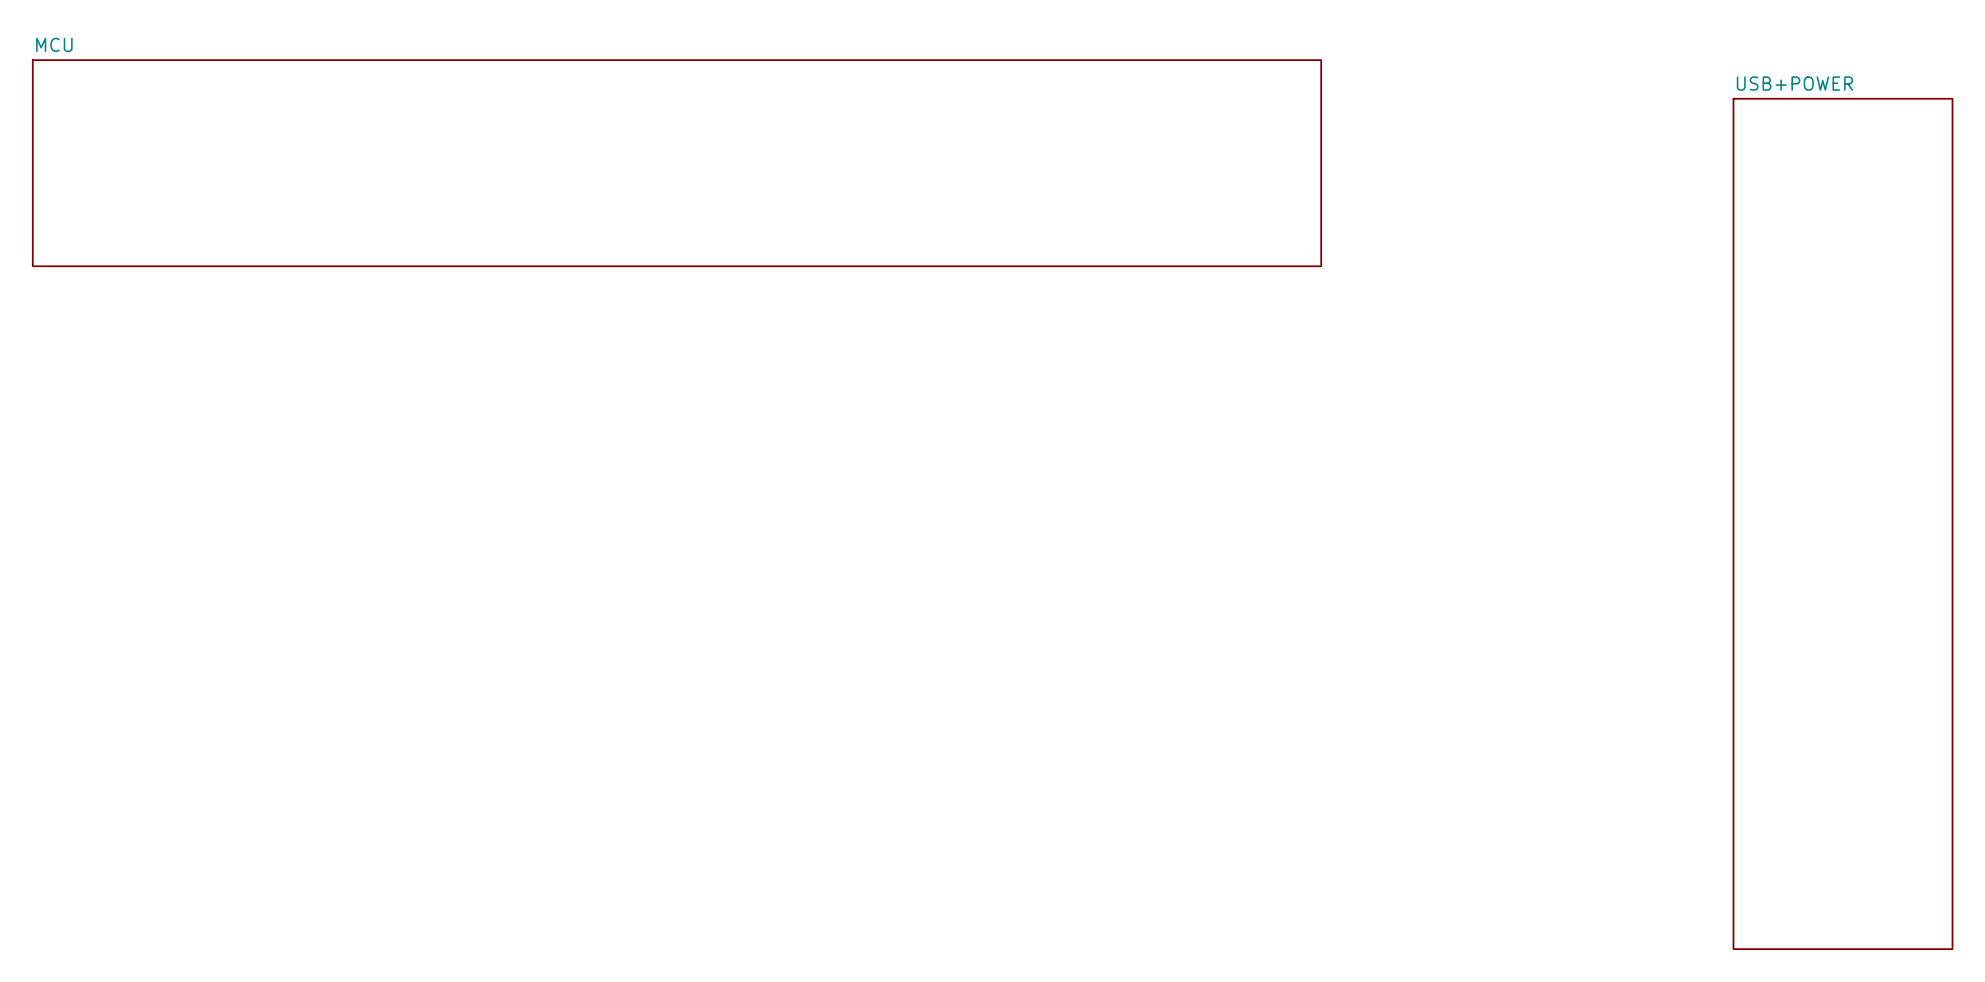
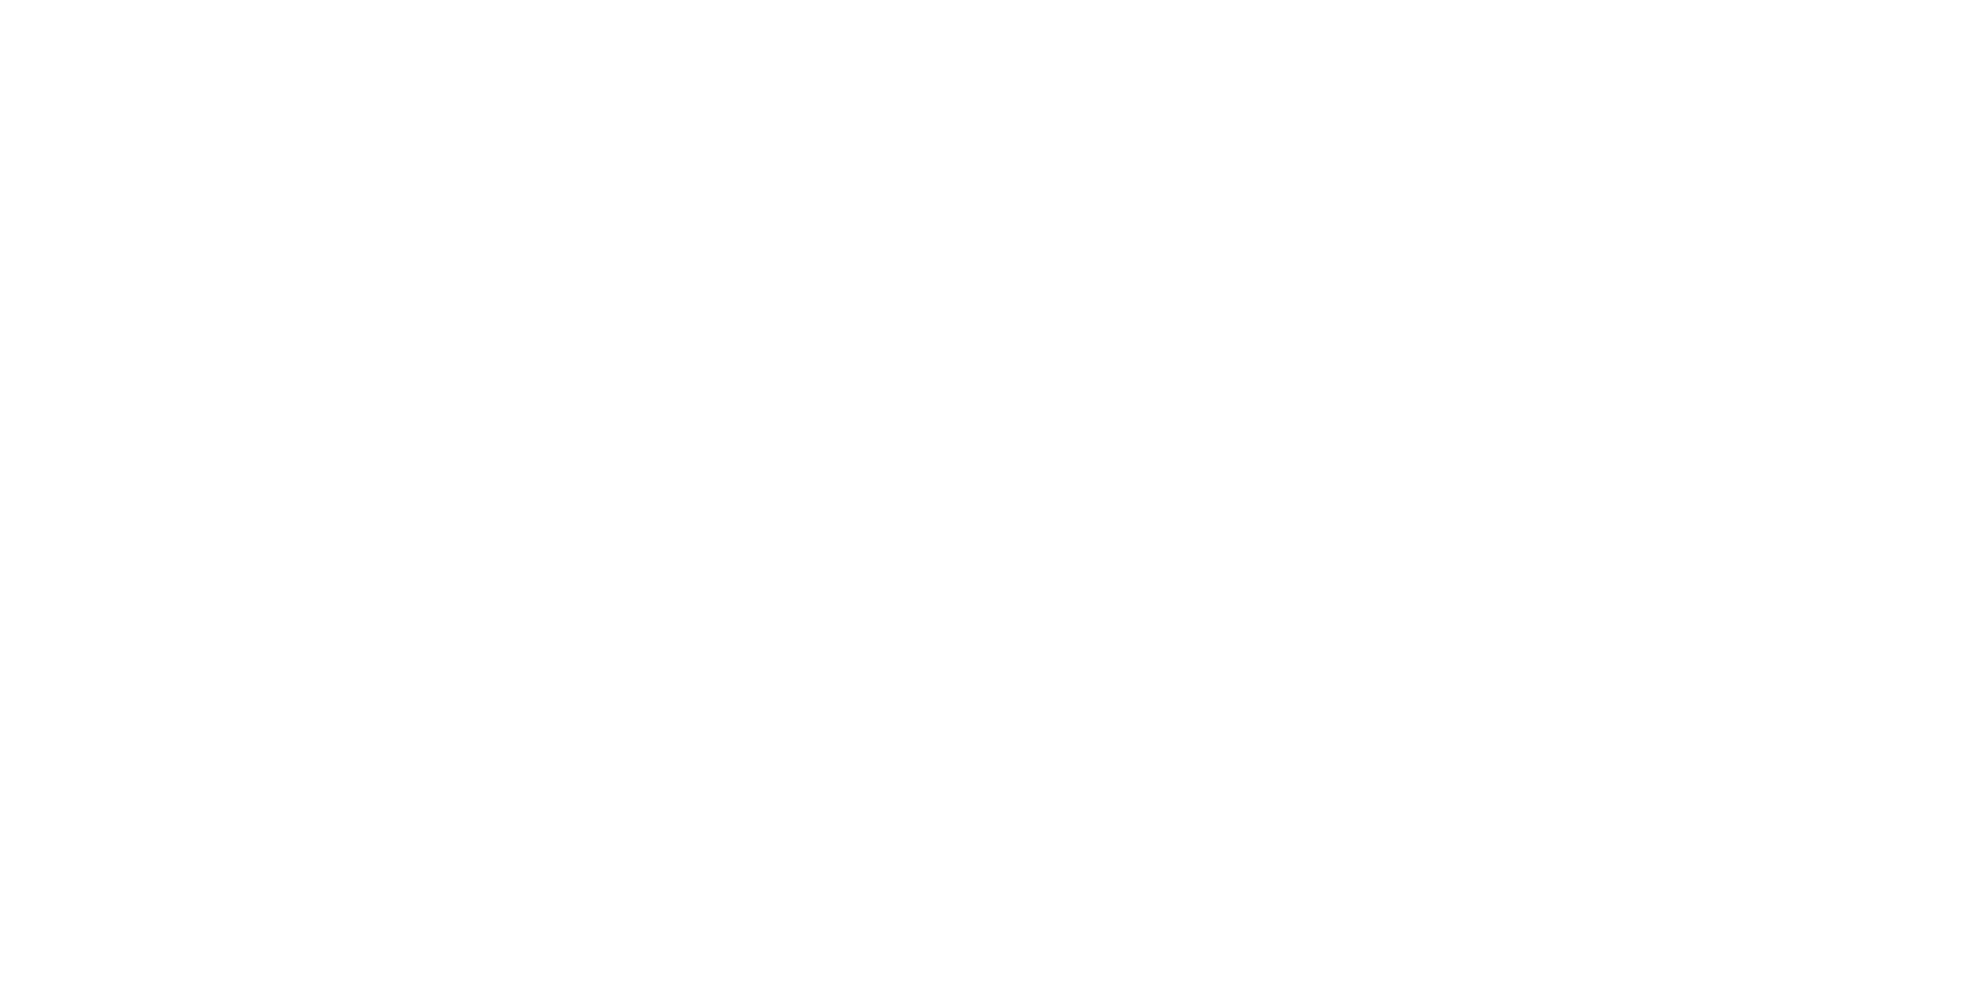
sheet MCU: (677, 163) -> none
sheet USB+POWER: (1842, 523) -> none

